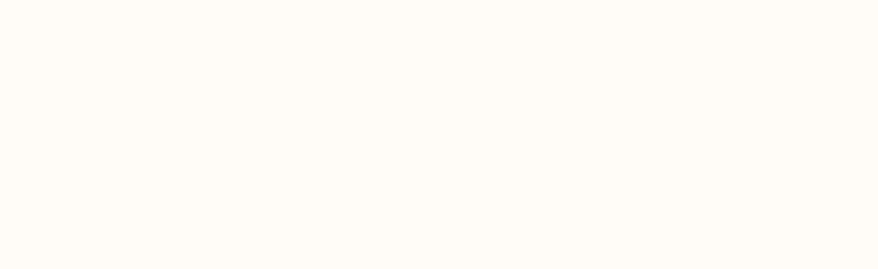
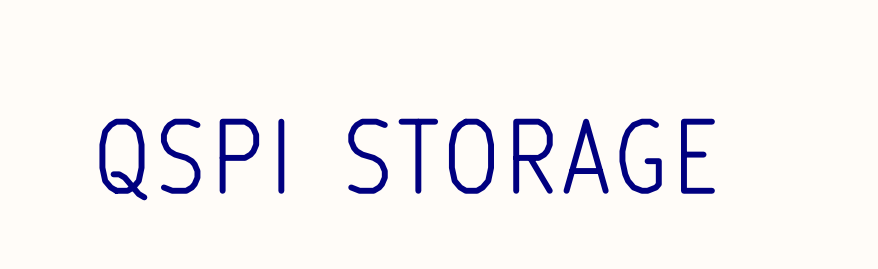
text: none -> QSPI STORAGE (407, 159)

